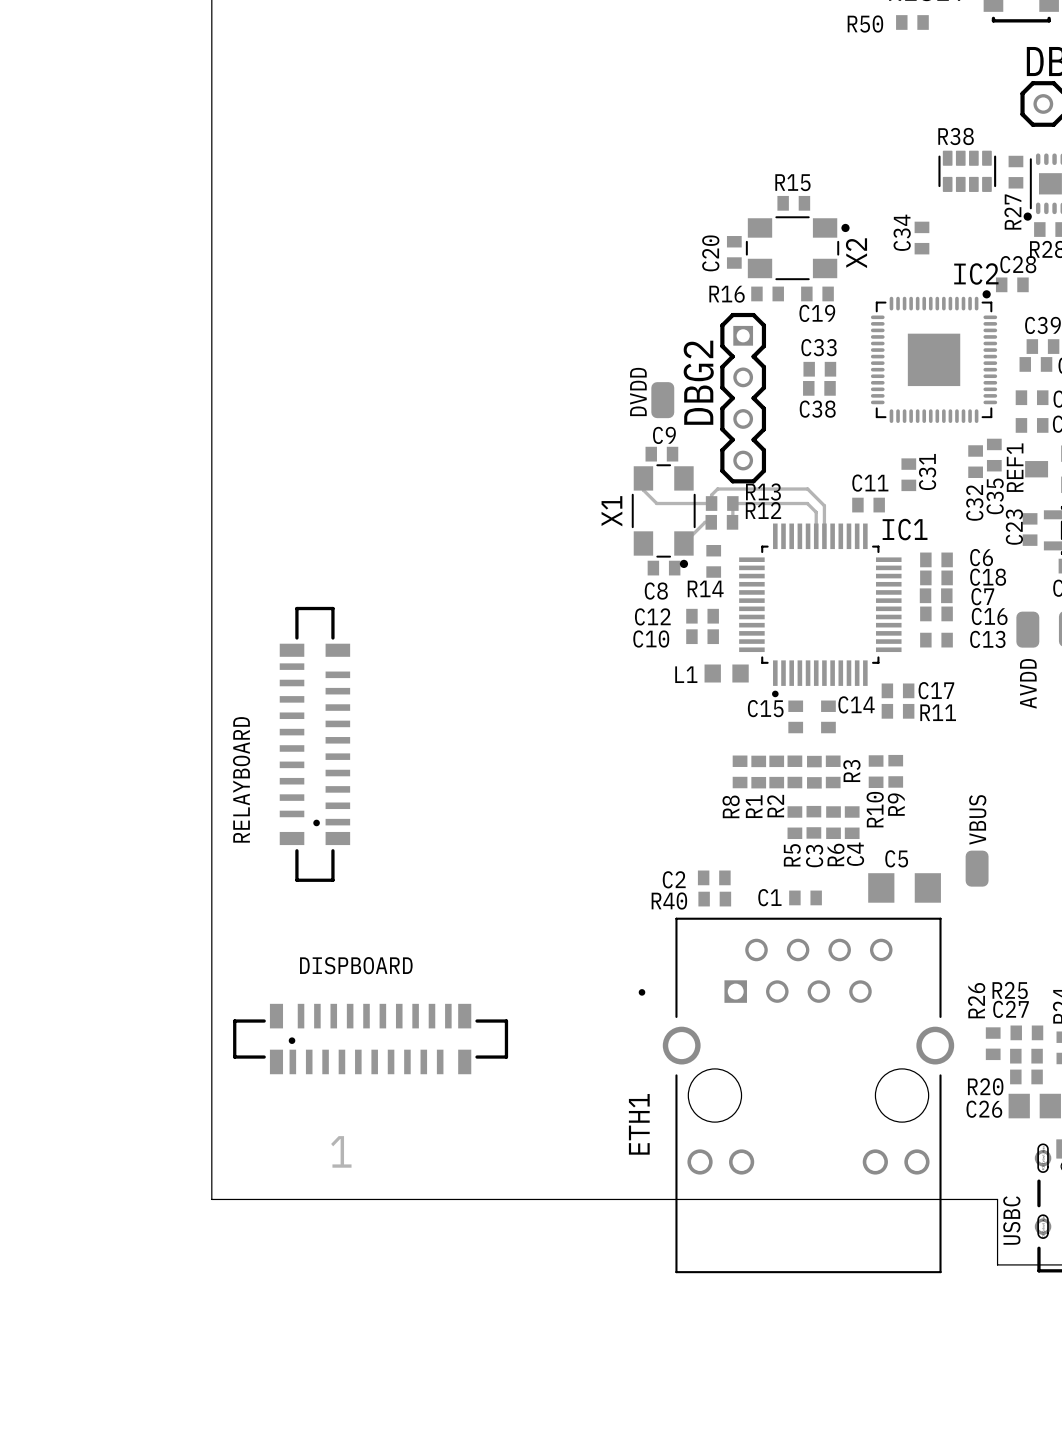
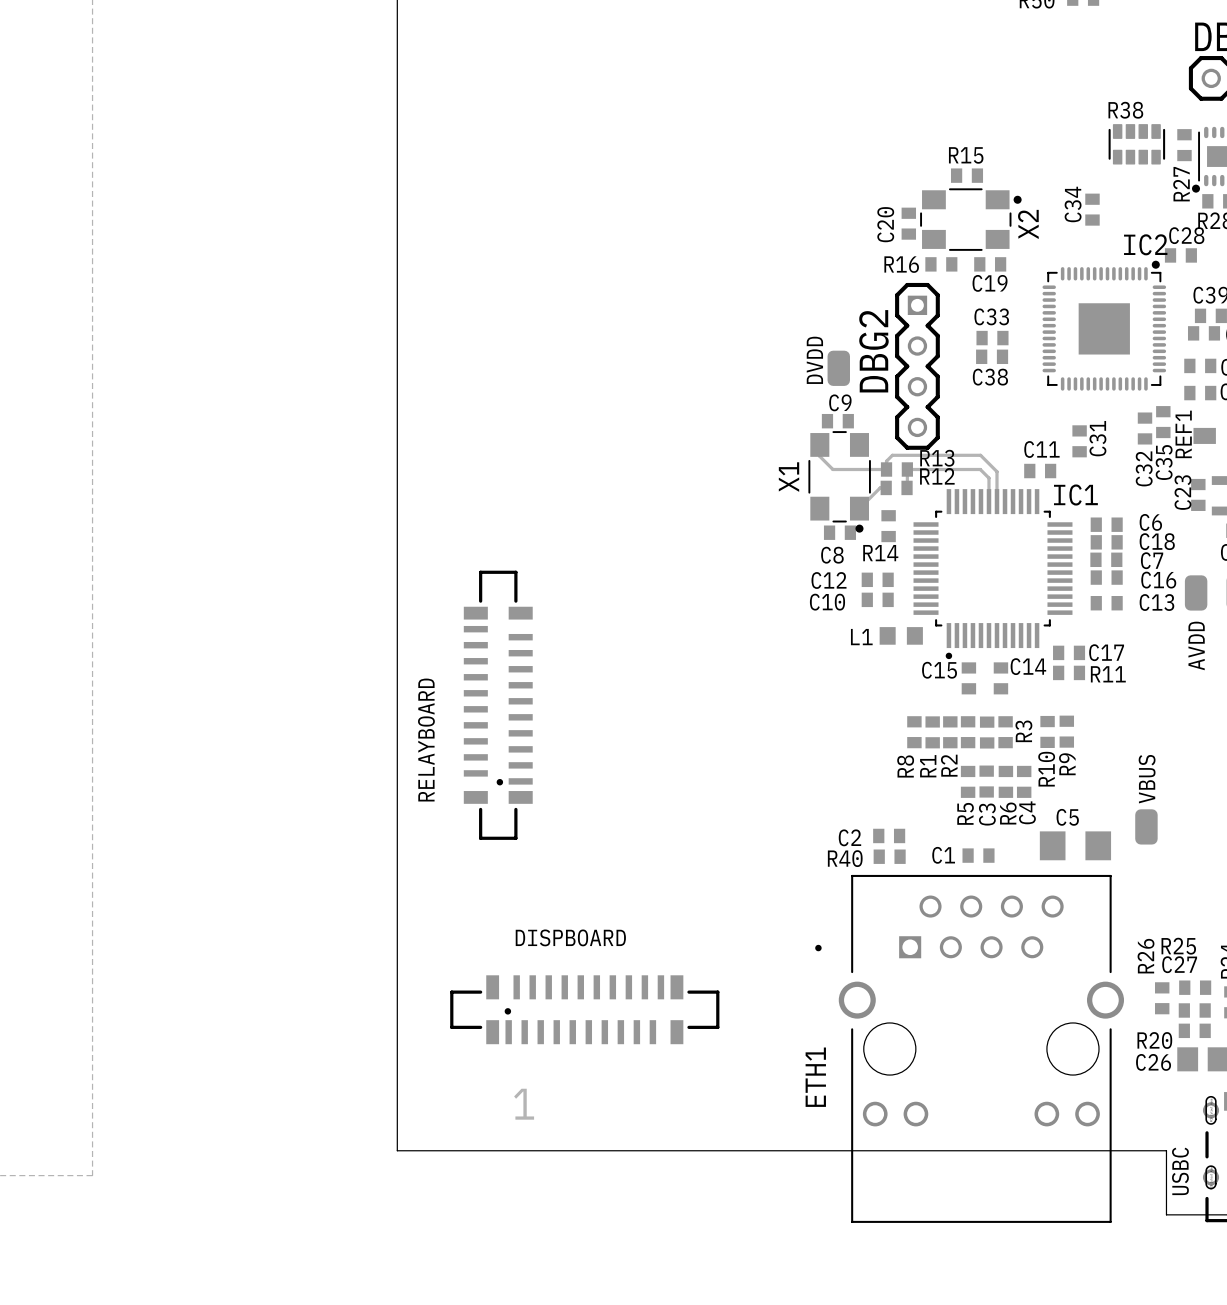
DISPBOARD position: (370, 1039) -> (584, 1009)

